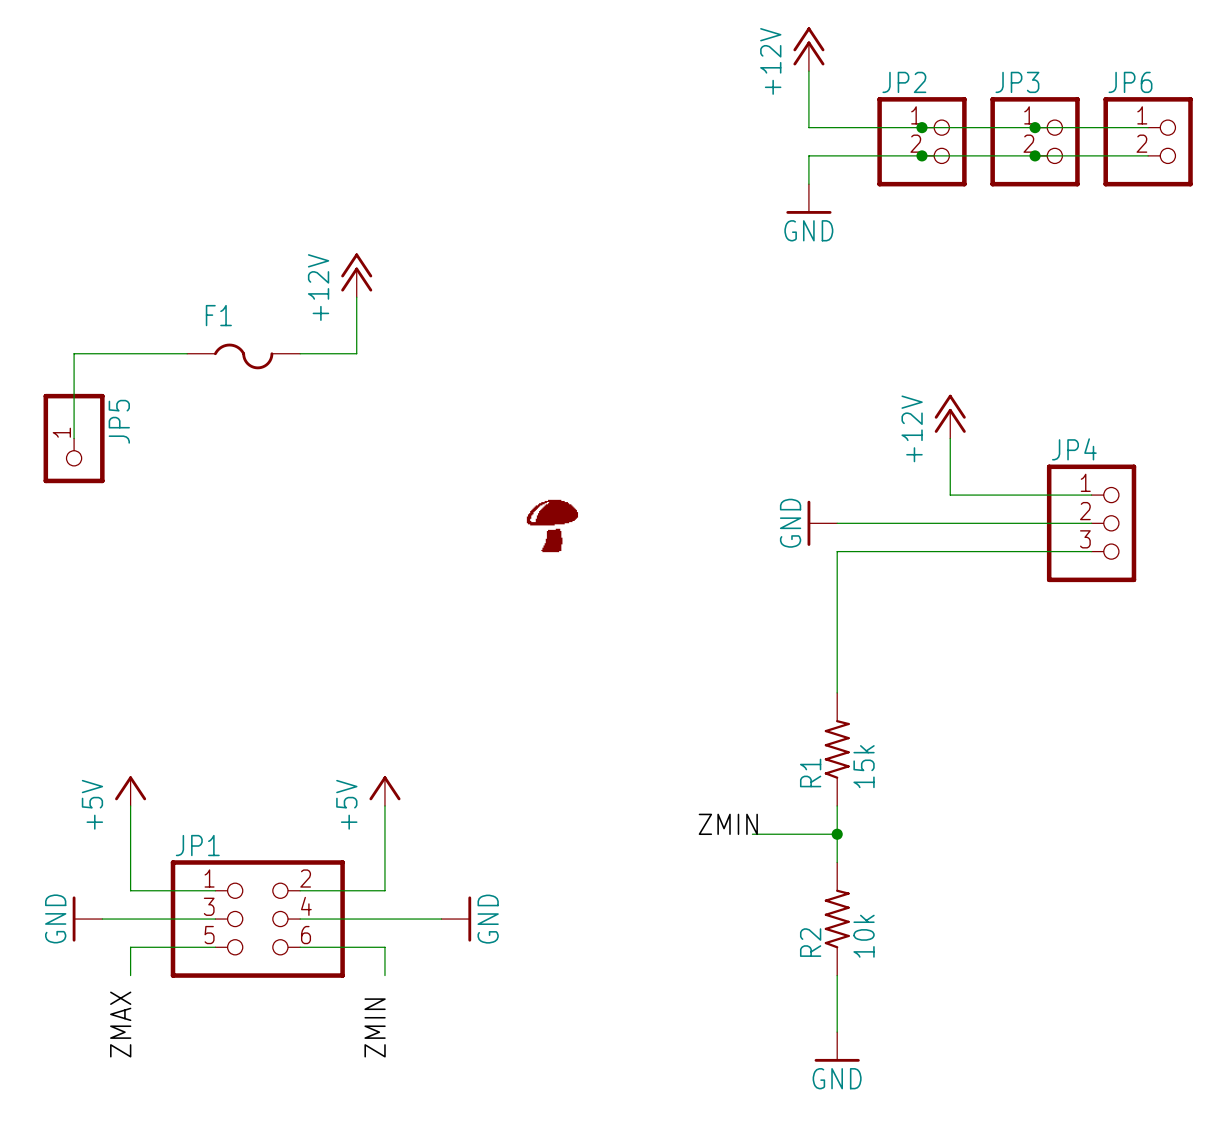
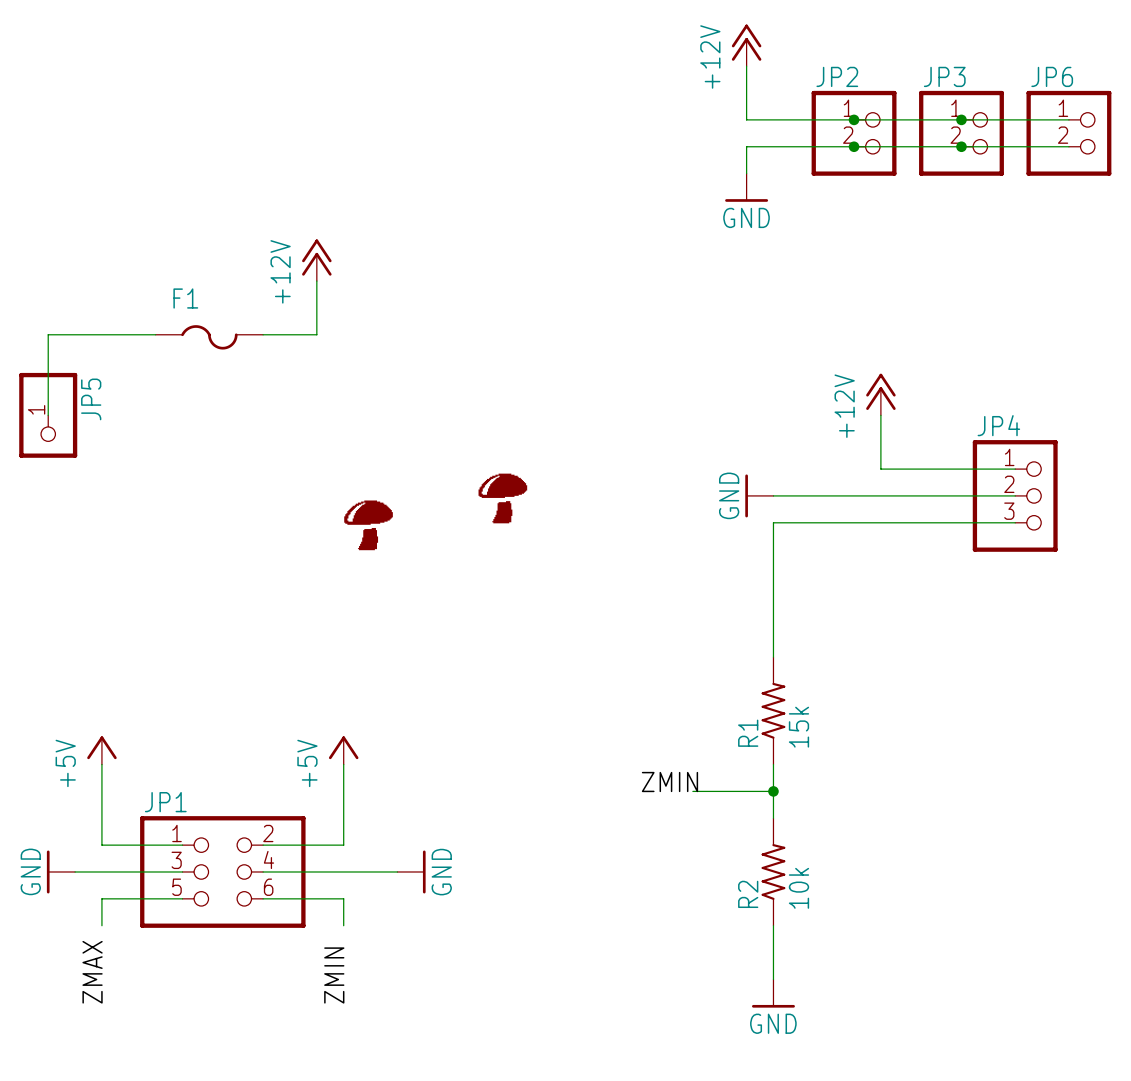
part: none -> (368, 525)

